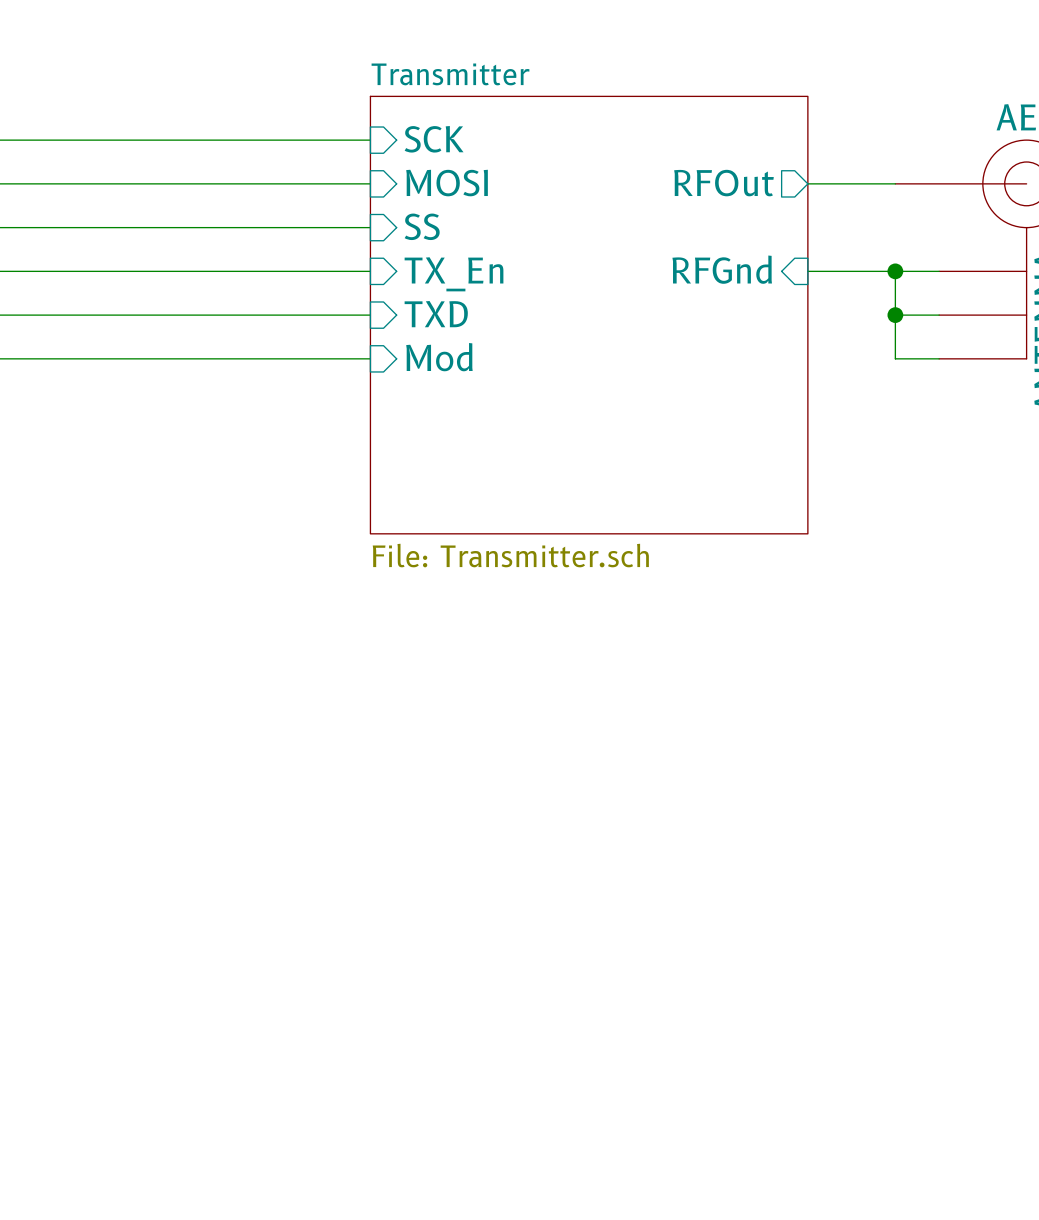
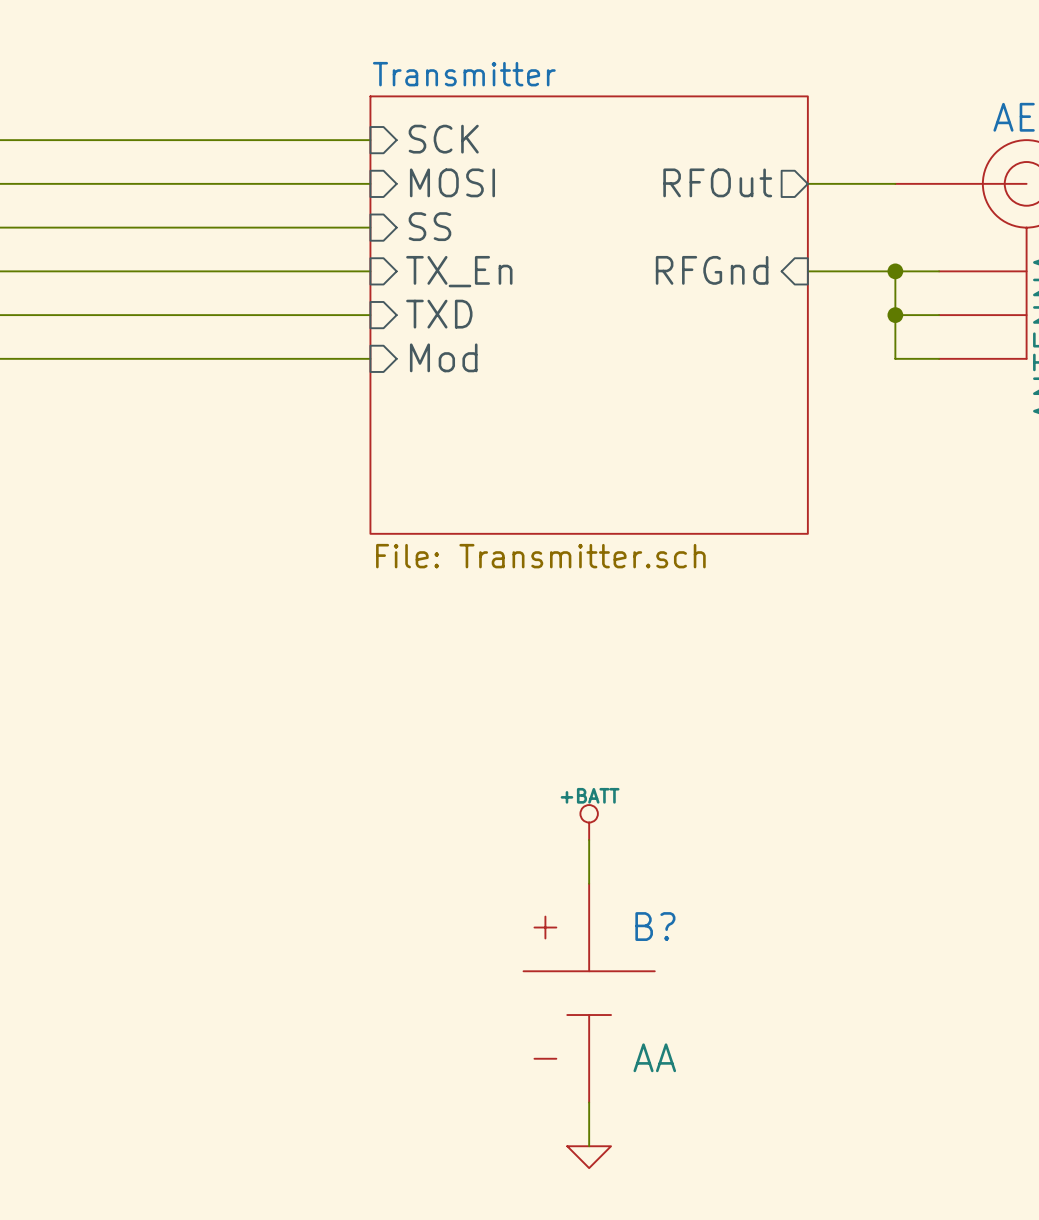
power symbol: none -> +BATT (589, 822)
wire: none -> (589, 840) (589, 883)
B?: none -> AA (589, 993)
wire: none -> (589, 1102) (589, 1146)
power symbol: none -> (589, 1157)

